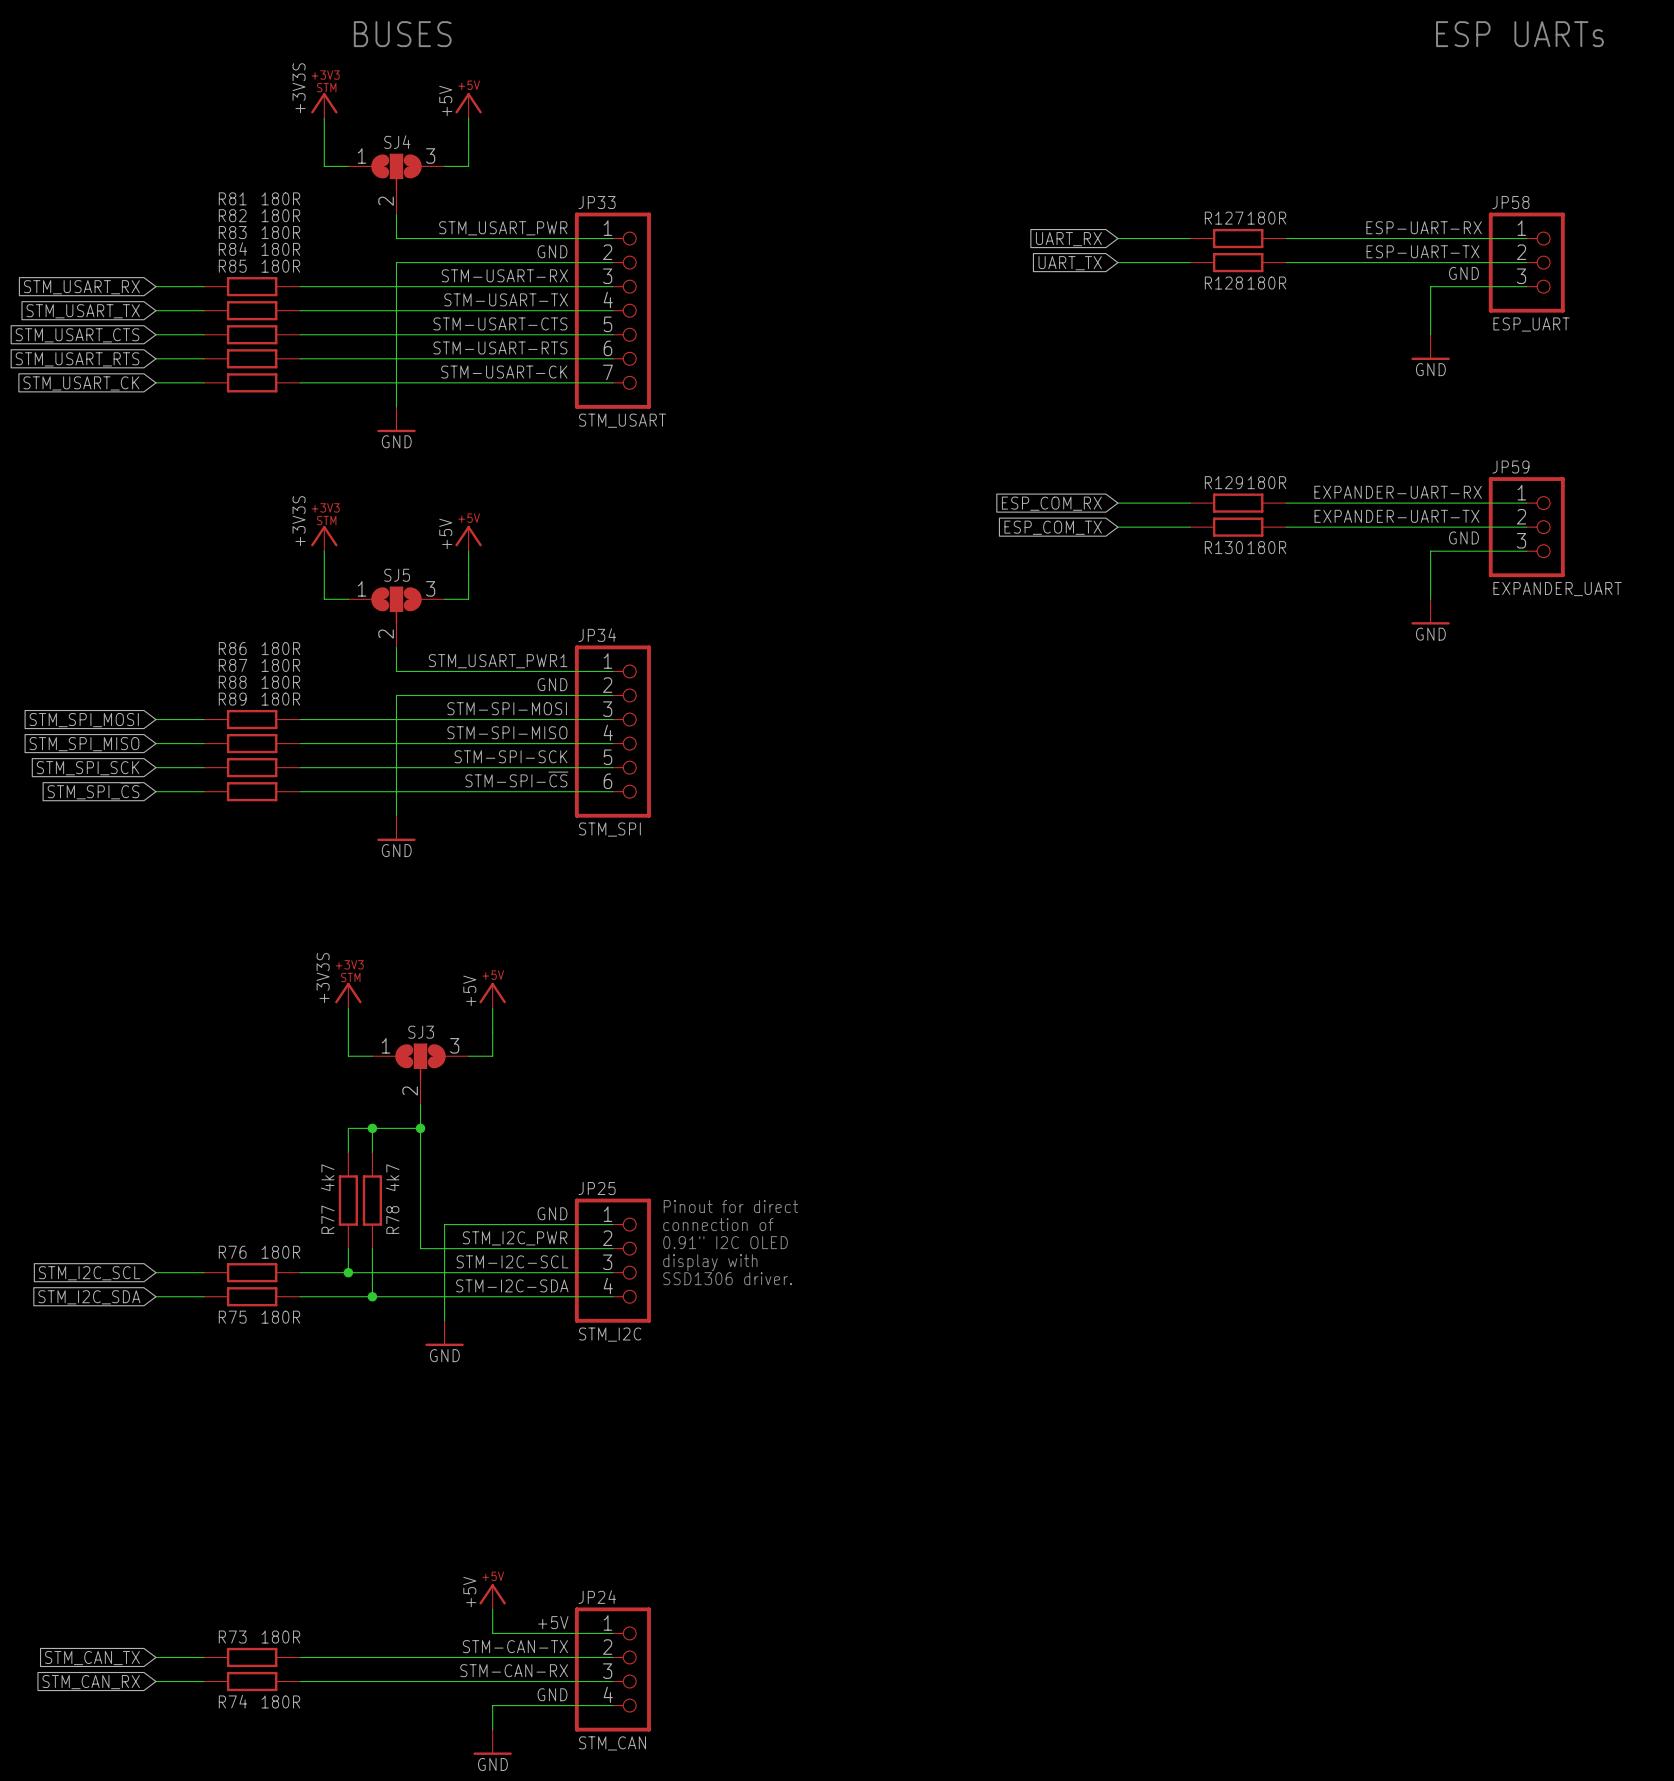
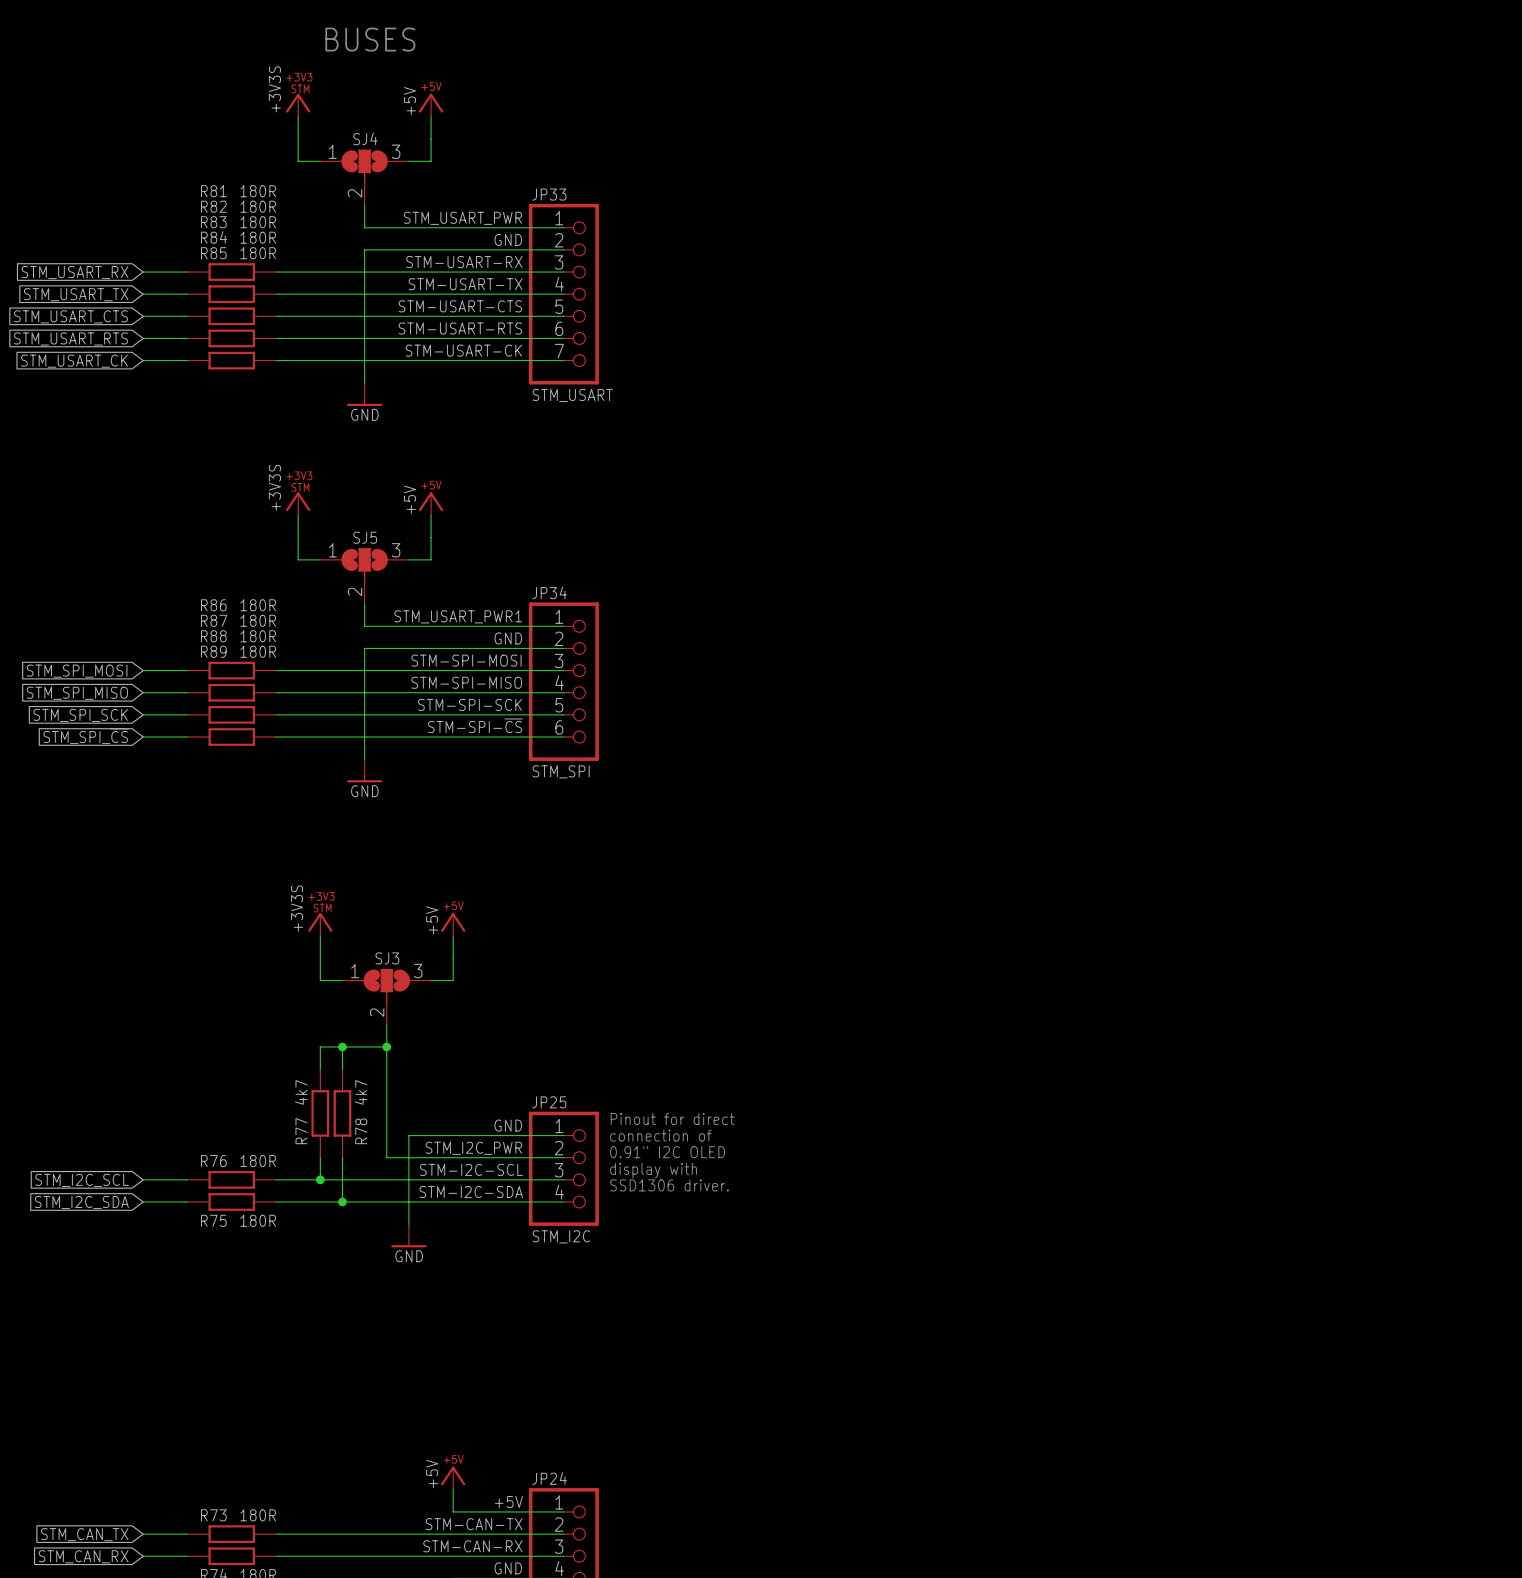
text: ESP UARTs (1519, 34) -> none
label: ESP-UART-RX (1424, 227) -> none
wire: (1117, 238) (1190, 238) -> none
R127: 180R (1238, 238) -> none
wire: (1286, 238) (1526, 238) -> none
global label: UART_RX (1068, 239) -> none
label: ESP-UART-TX (1423, 251) -> none
wire: (1117, 262) (1190, 262) -> none
R128: 180R (1238, 262) -> none
wire: (1286, 262) (1526, 262) -> none
JP58: ESP_UART (1526, 262) -> none
global label: UART_TX (1070, 263) -> none
label: GND (1463, 273) -> none
wire: (1526, 286) (1430, 286) (1430, 334) -> none
power symbol: GND (1430, 347) -> none
label: EXPANDER-UART-RX (1398, 492) -> none
global label: ESP_COM_RX (1051, 503) -> none
wire: (1117, 503) (1190, 503) -> none
R129: 180R (1238, 503) -> none
wire: (1286, 503) (1526, 503) -> none
label: EXPANDER-UART-TX (1396, 516) -> none
global label: ESP_COM_TX (1053, 527) -> none
wire: (1117, 527) (1190, 527) -> none
R130: 180R (1238, 527) -> none
wire: (1286, 527) (1526, 527) -> none
JP59: EXPANDER_UART (1526, 527) -> none
label: GND (1463, 537) -> none
wire: (1526, 551) (1430, 551) (1430, 599) -> none
power symbol: GND (1430, 611) -> none

